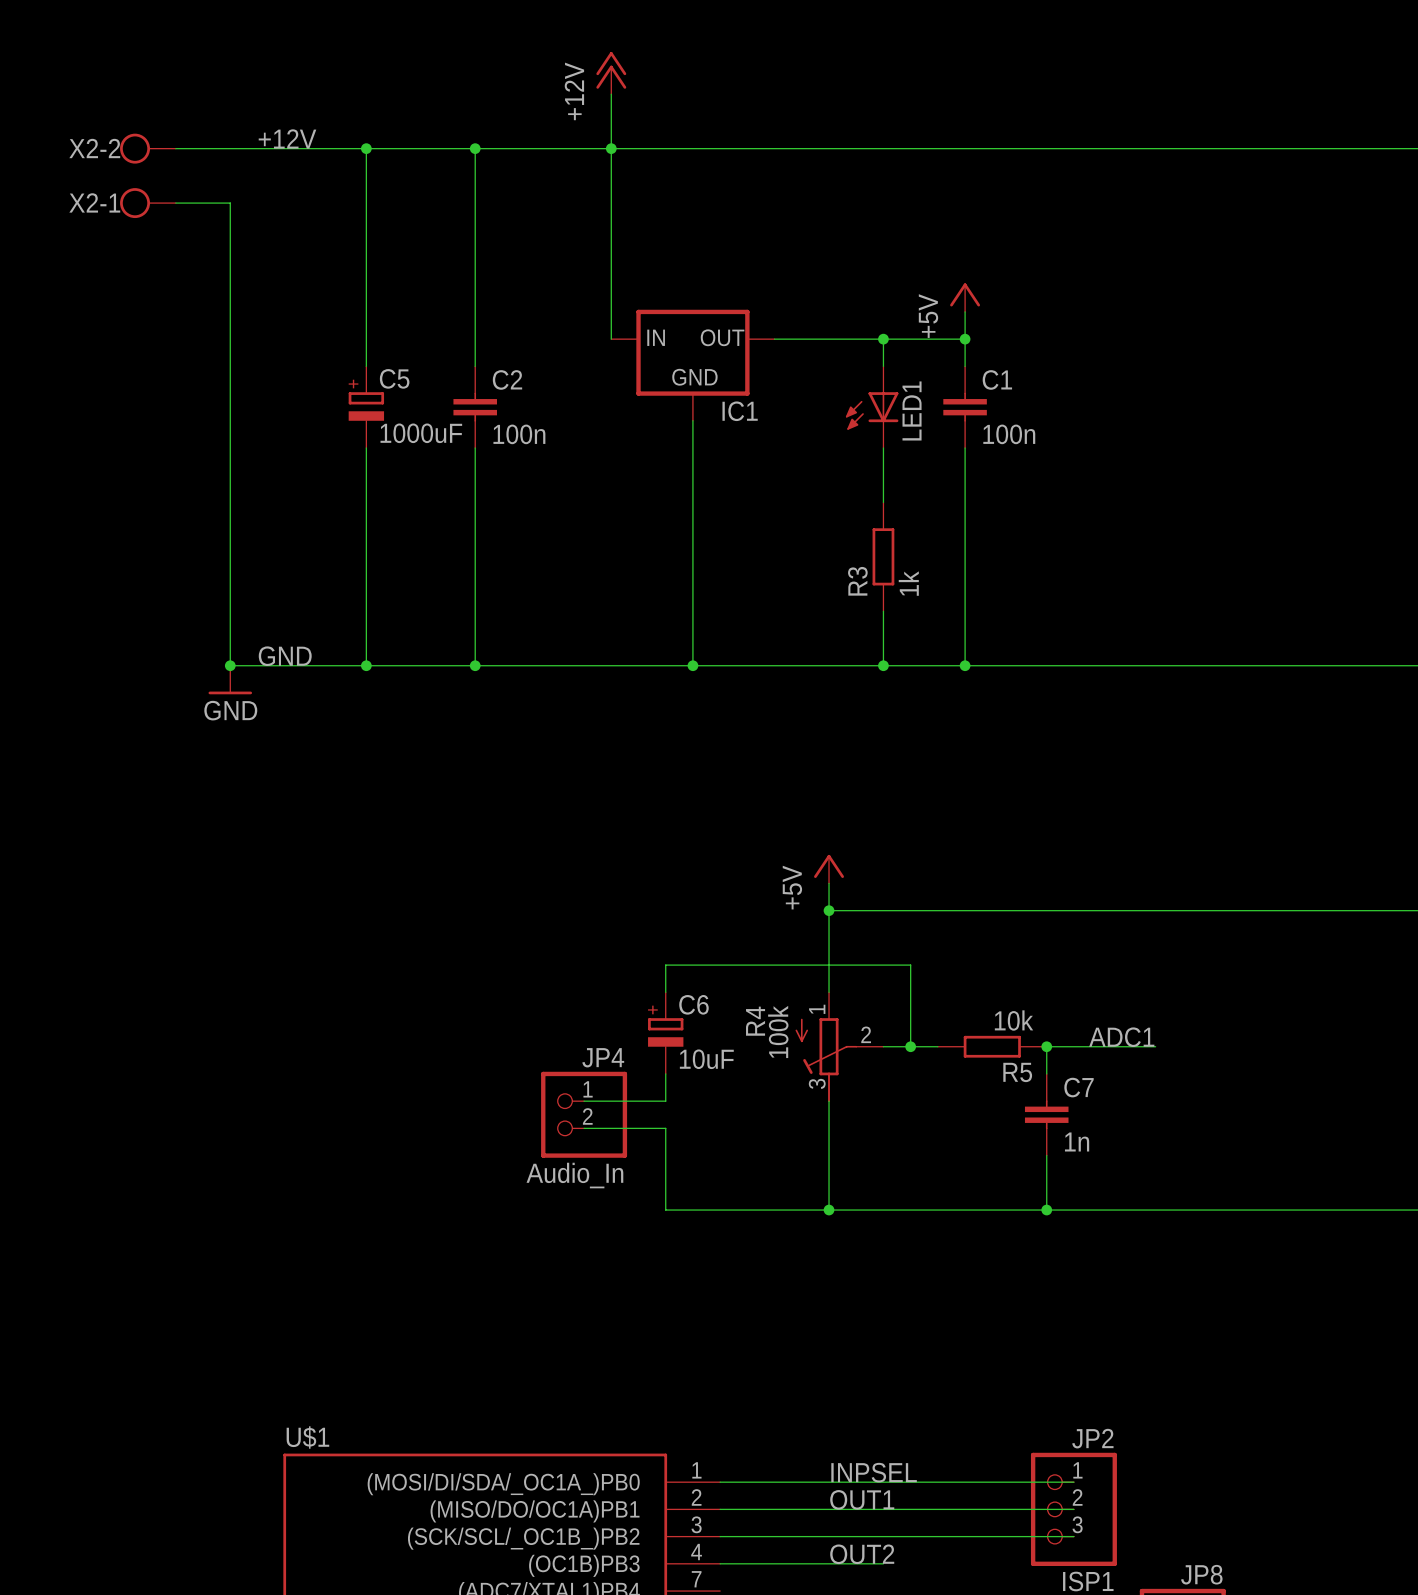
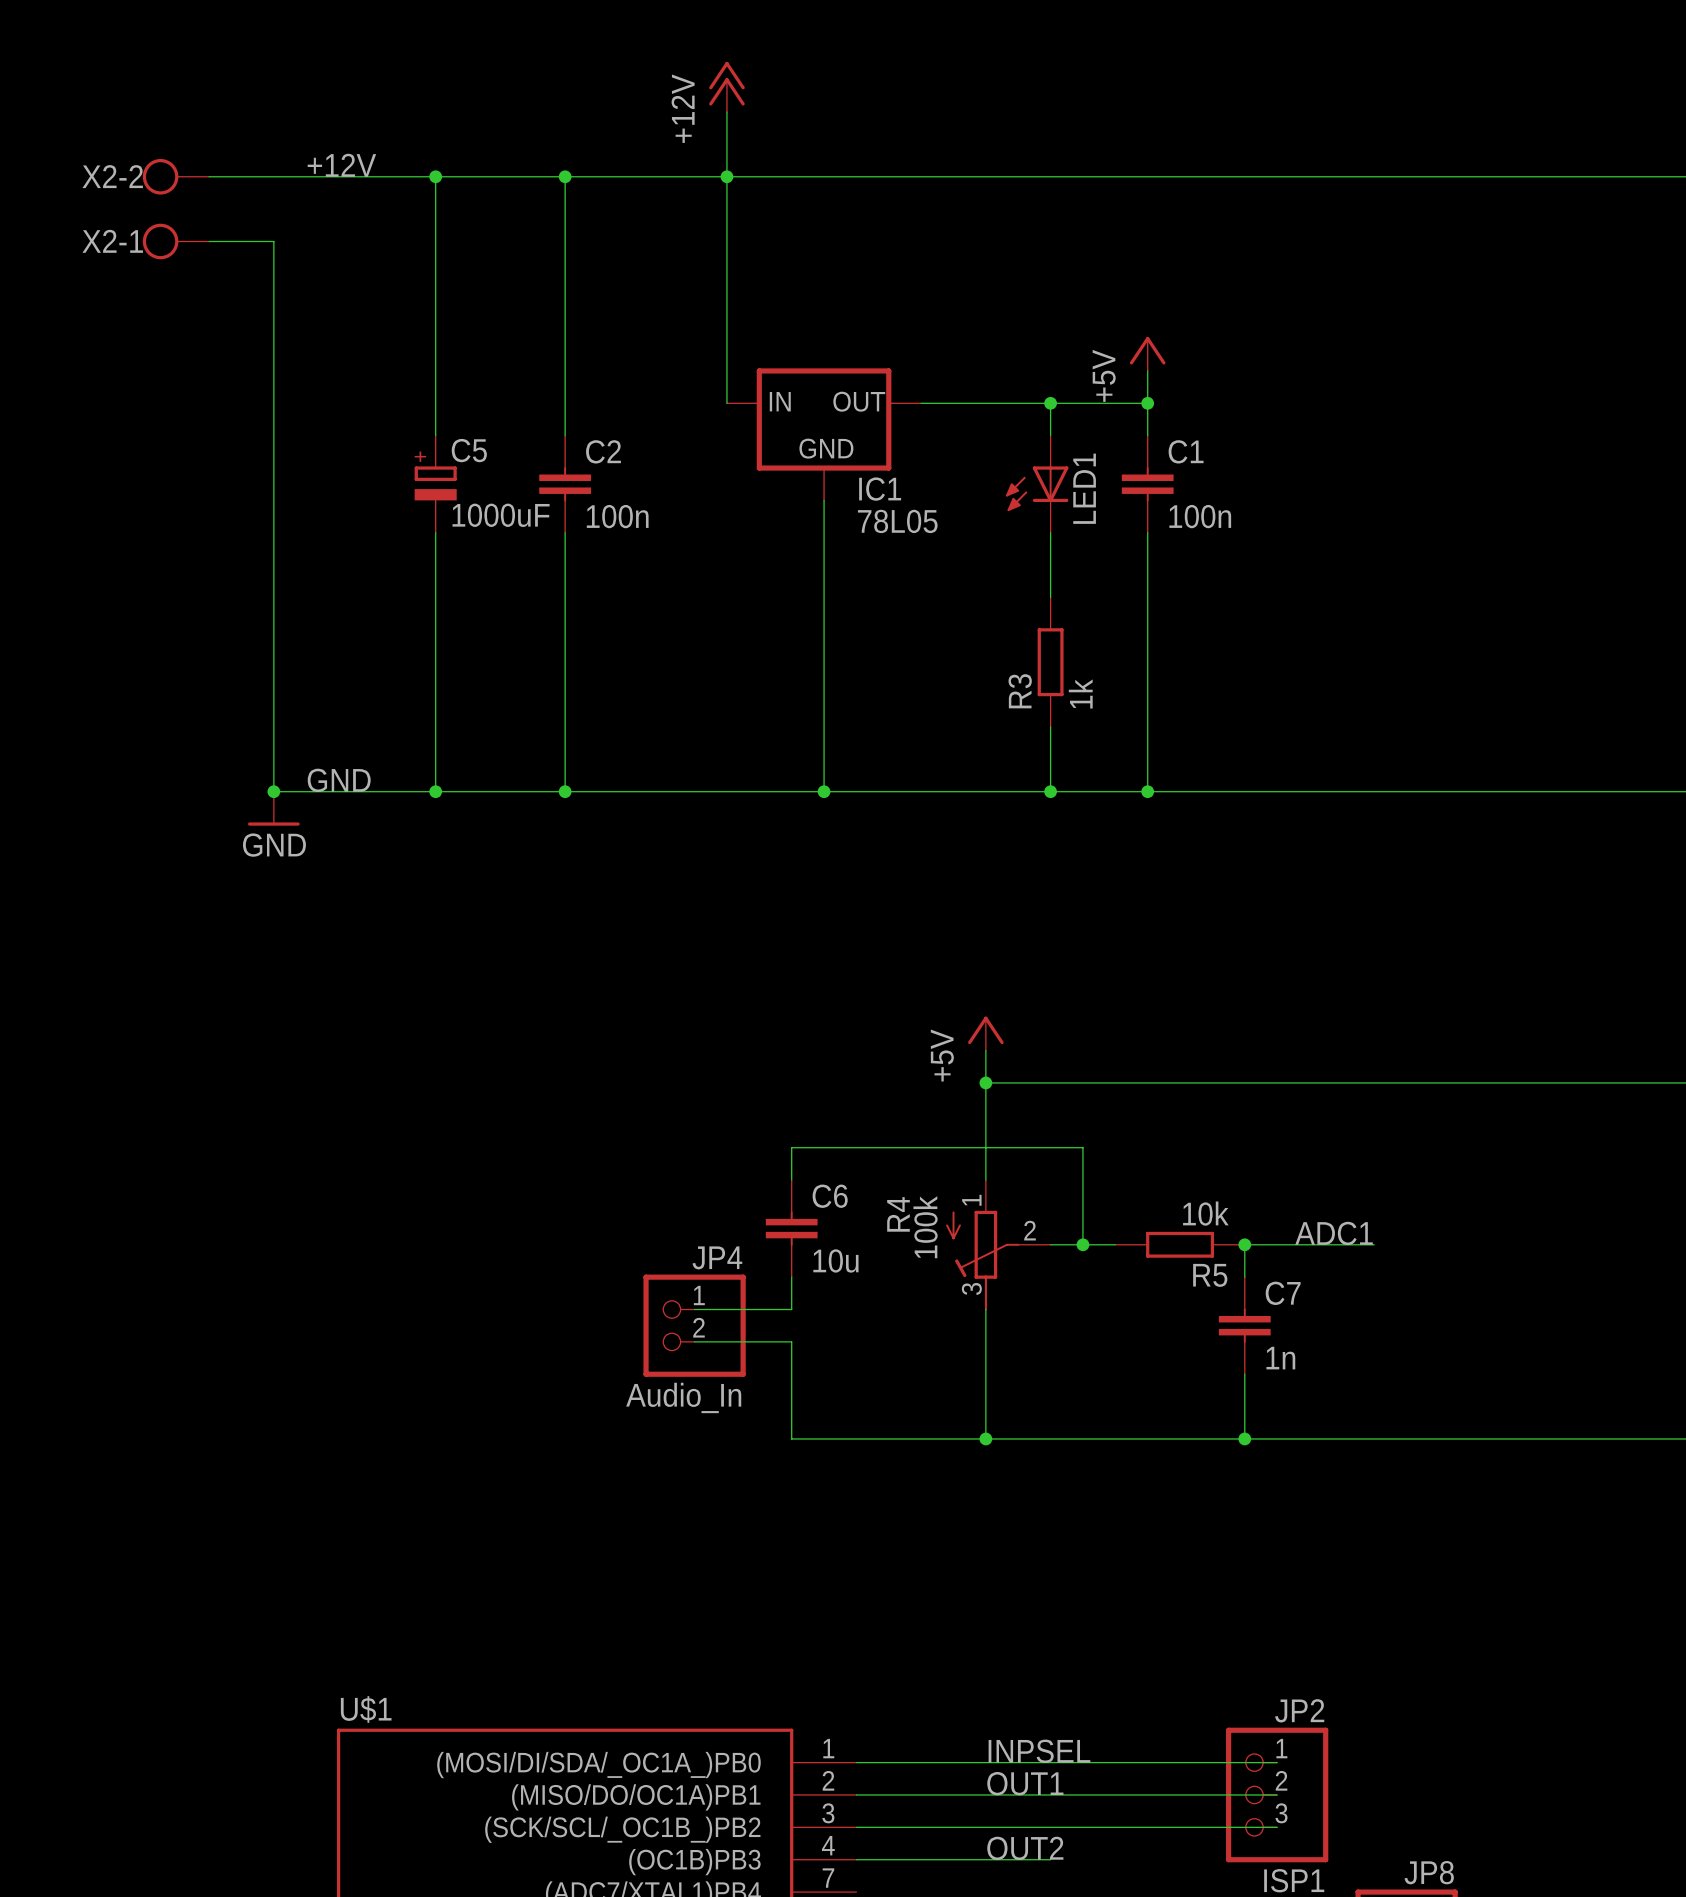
IC1 value: none -> 78L05 (897, 521)
C6 symbol: [648, 992, 684, 1074] -> [765, 1180, 818, 1278]
C6 value: 10uF (706, 1059) -> 10u (835, 1260)

